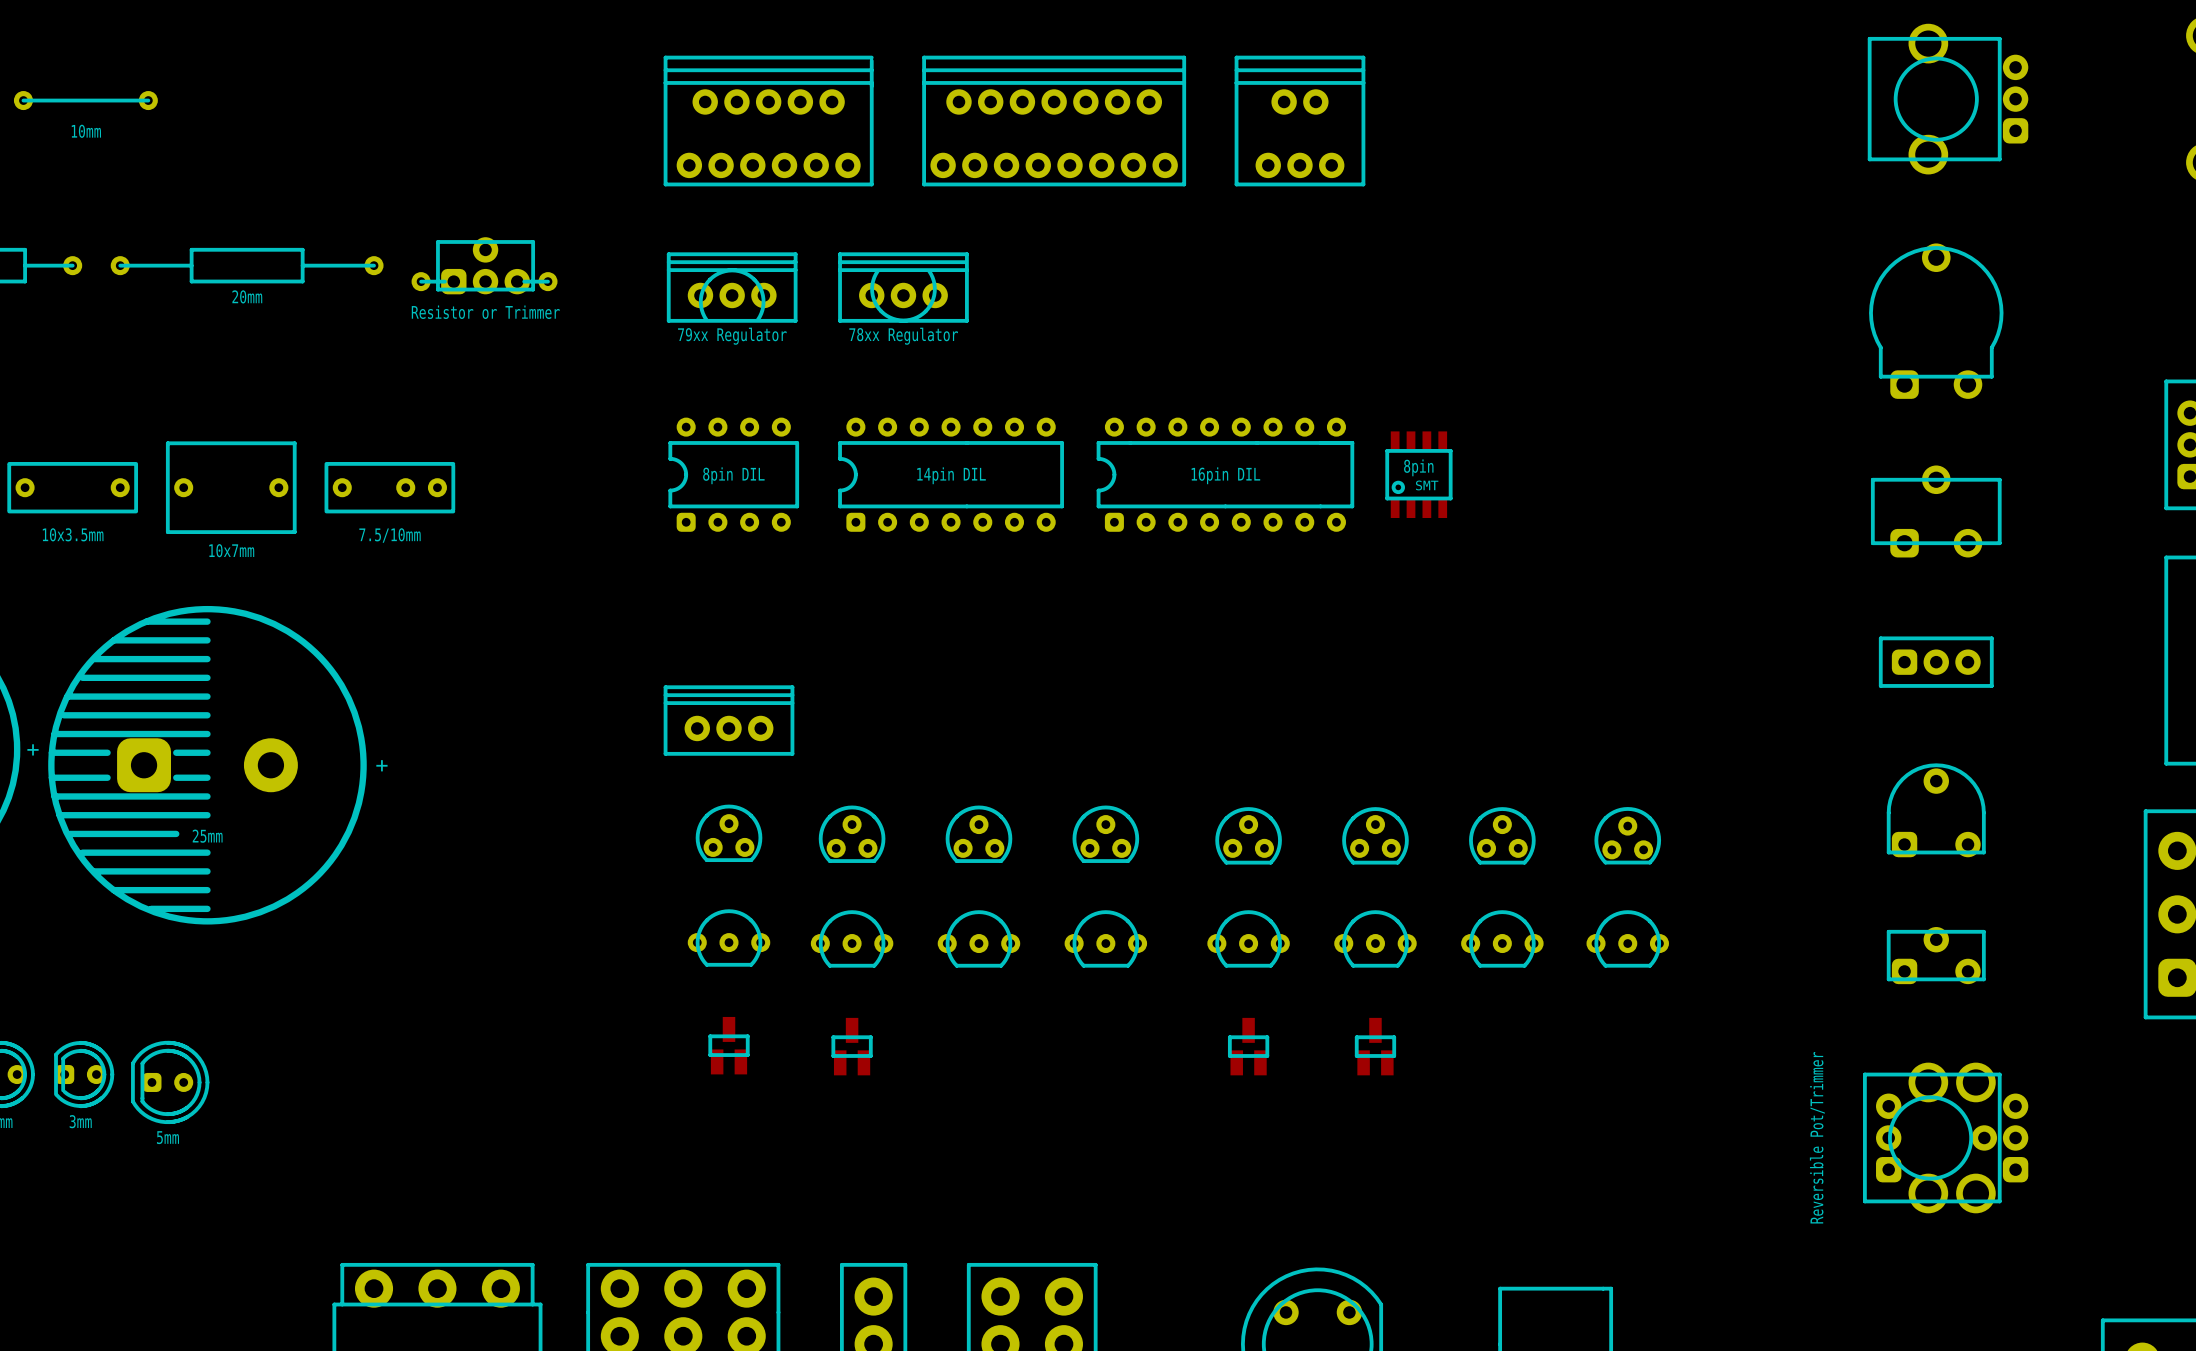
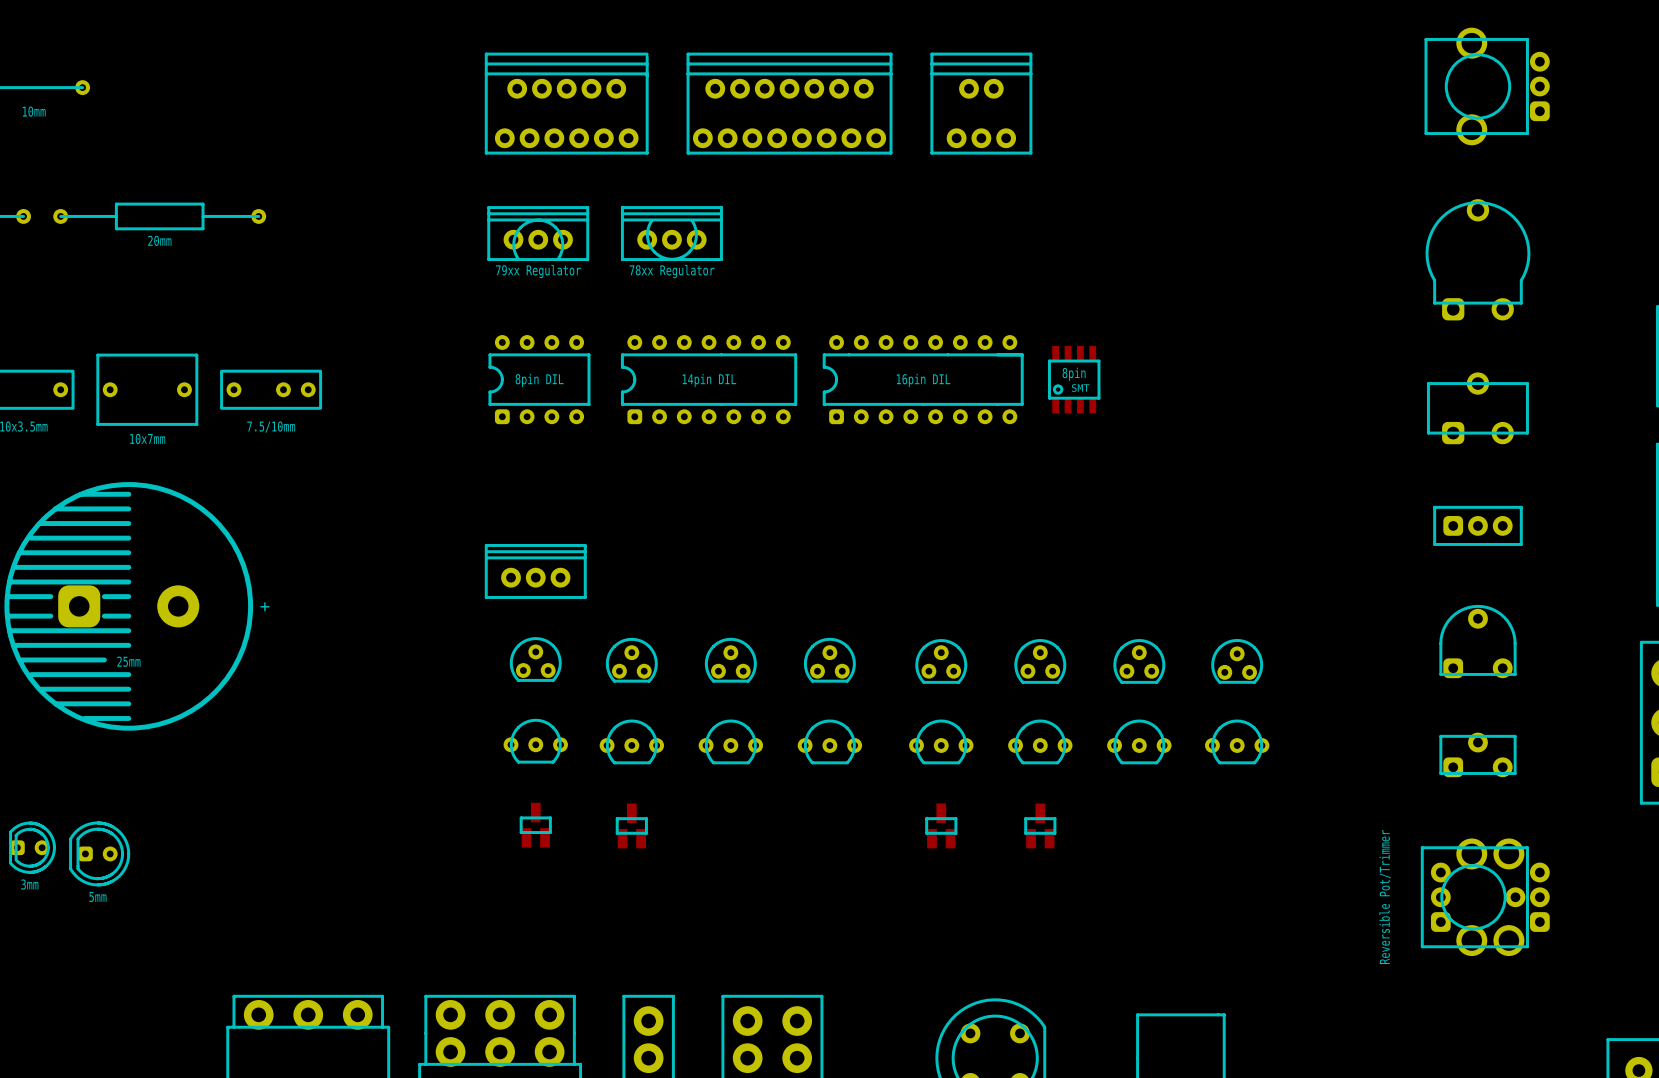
Resistor or Trimmer: (484, 265) -> none

